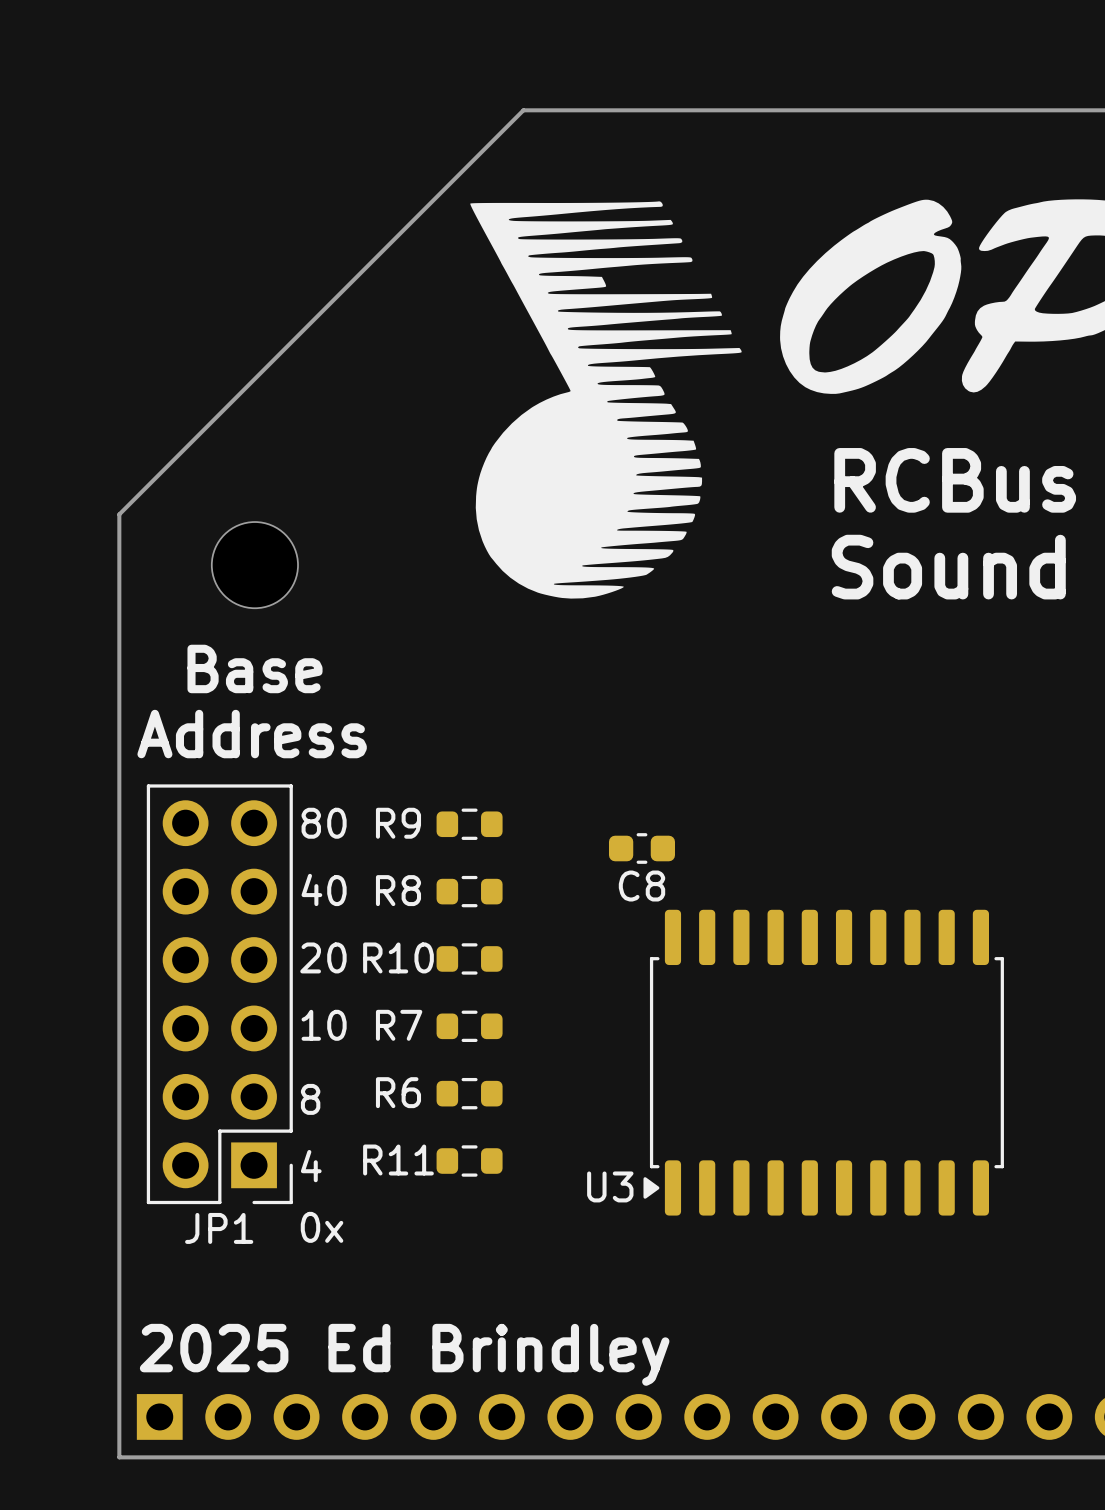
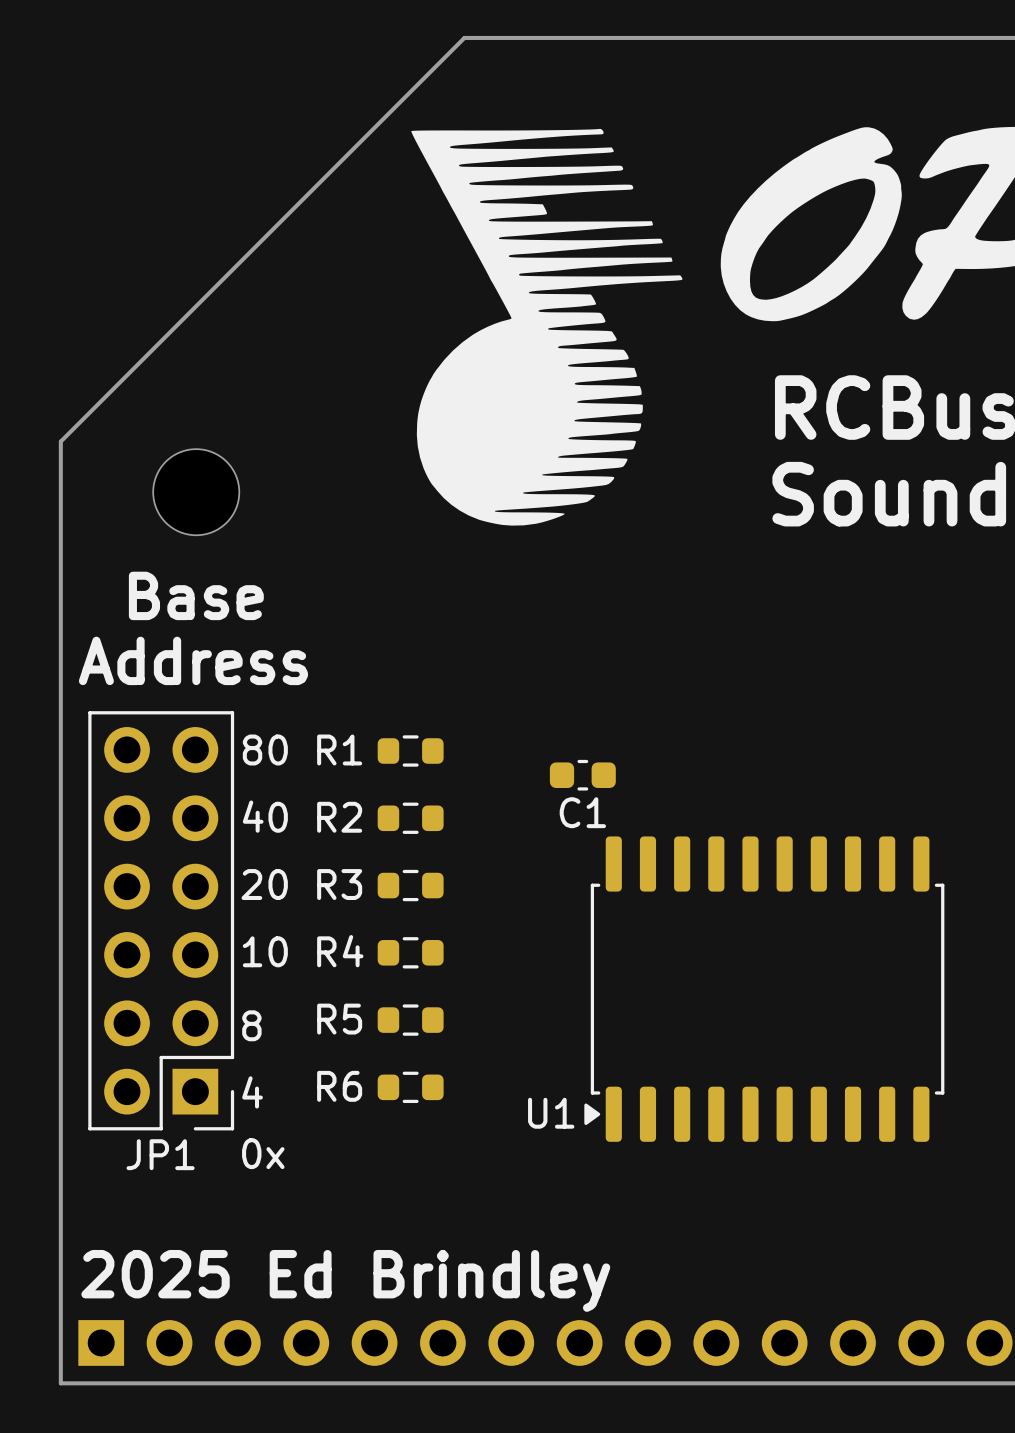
R9 name: R9 (398, 823) -> R1 (339, 749)
C8 name: C8 (641, 886) -> C1 (582, 812)
R8 name: R8 (398, 890) -> R2 (339, 817)
R10 name: R10 (398, 957) -> R3 (339, 884)
R7 name: R7 (399, 1025) -> R4 (340, 951)
R6 name: R6 (398, 1092) -> R5 (339, 1019)
R11 name: R11 (398, 1160) -> R6 (339, 1086)
U3 name: U3 (610, 1186) -> U1 (551, 1113)

